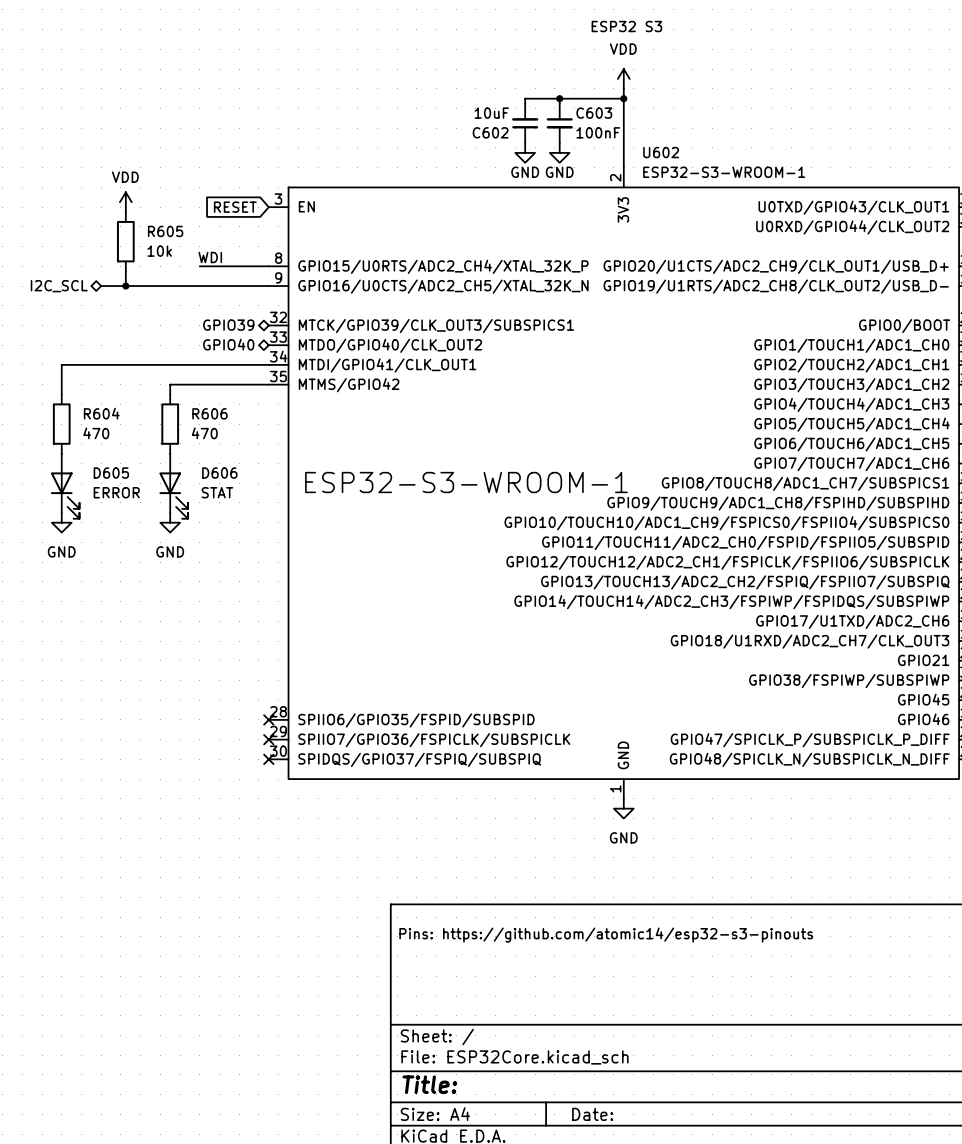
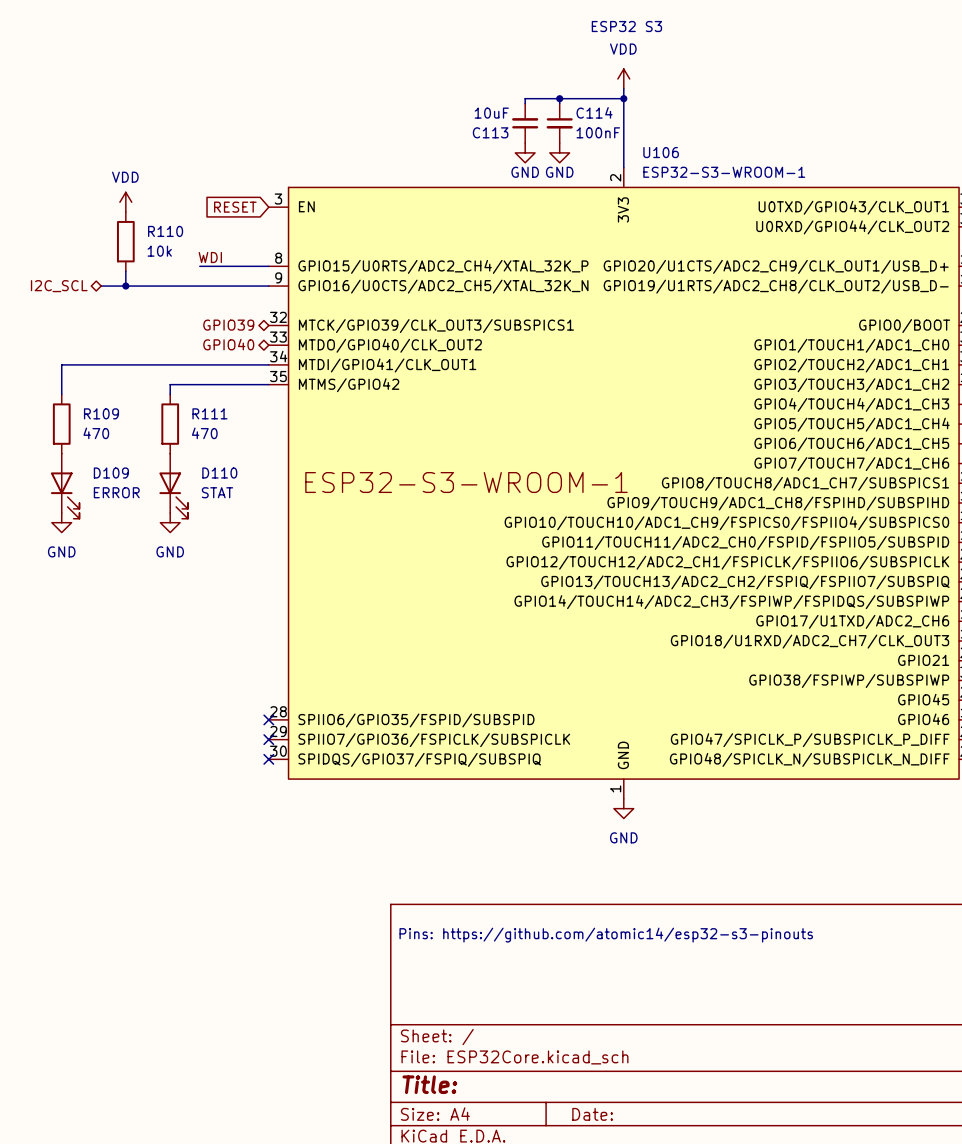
C603 name: C603 (594, 113) -> C114 (594, 112)
C602 name: C602 (490, 132) -> C113 (490, 132)
U602 name: U602 (661, 152) -> U106 (661, 152)
R605 name: R605 (165, 231) -> R110 (165, 231)
R604 name: R604 (101, 413) -> R109 (101, 413)
R606 name: R606 (209, 413) -> R111 (209, 413)
D605 name: D605 (111, 473) -> D109 (111, 473)
D606 name: D606 (219, 473) -> D110 (219, 473)

